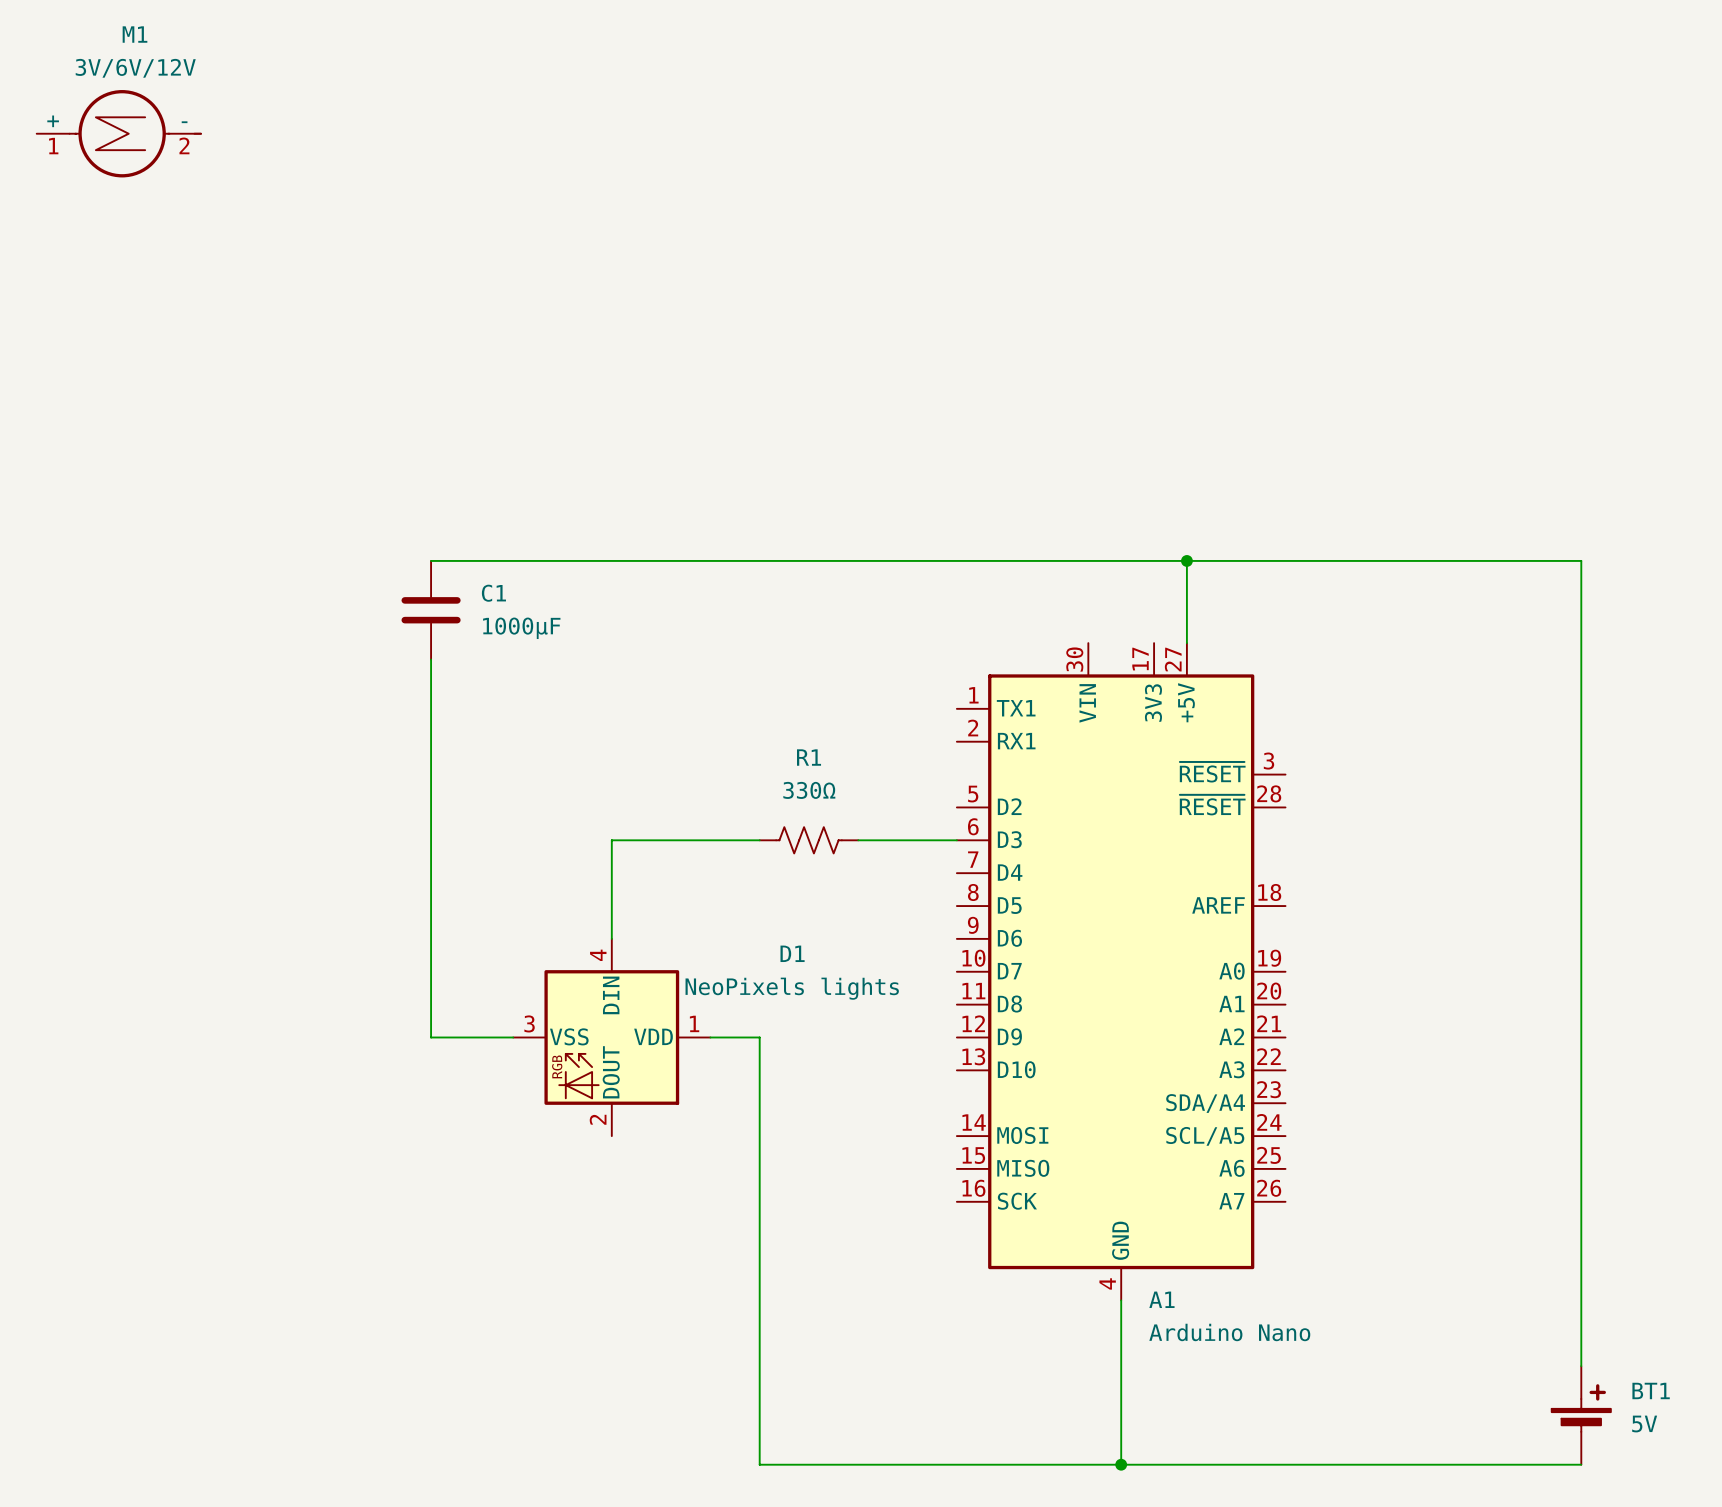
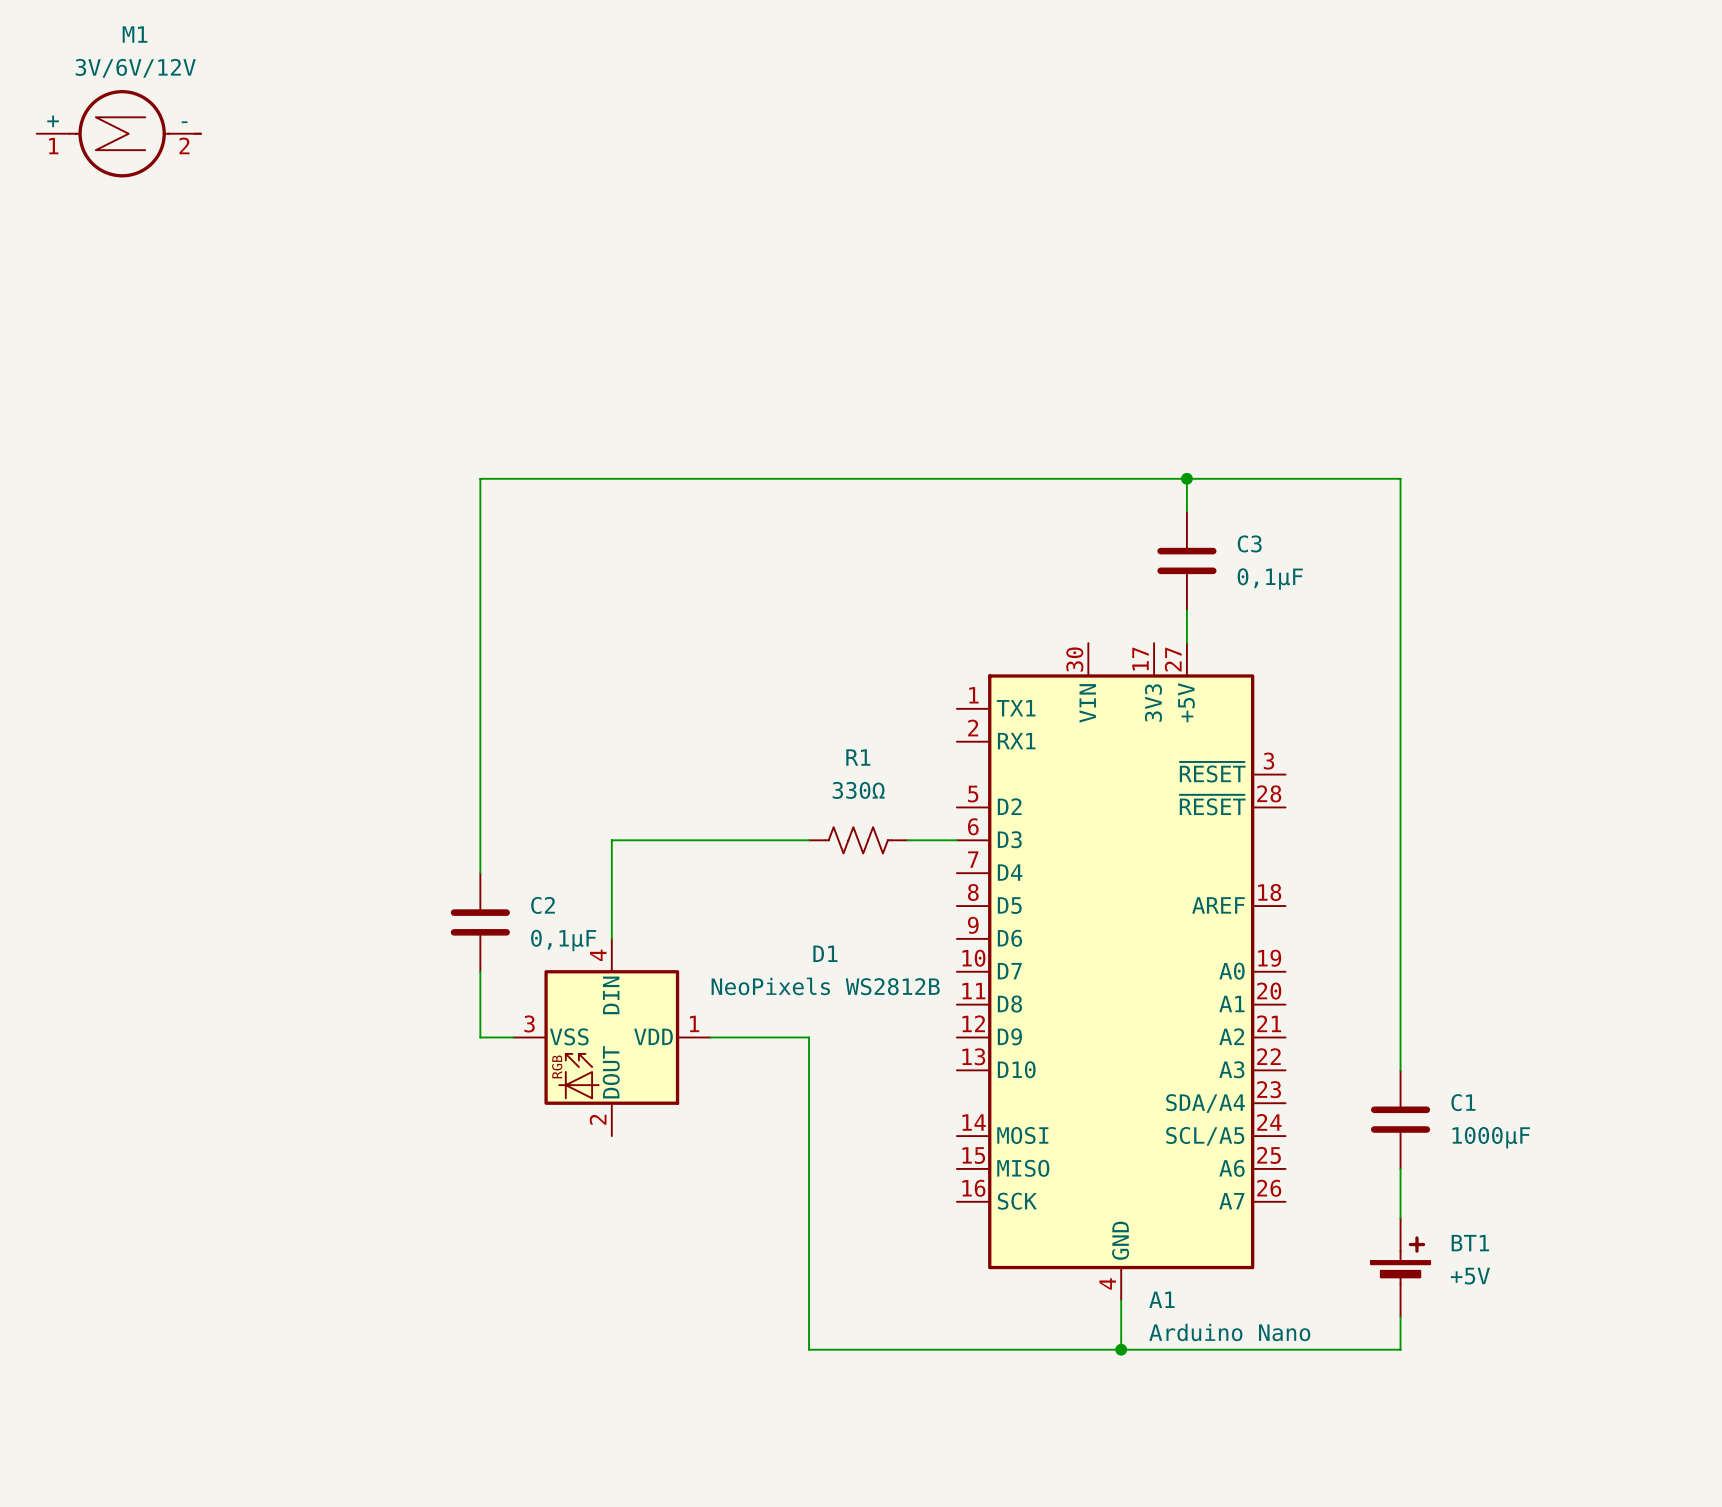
wire: none -> (1186, 478) (1186, 511)
junction: none -> (1186, 478)
wire: (431, 560) (1581, 560) (1581, 1366) -> none
junction: (1186, 560) -> none
C3: none -> 0,1µF (1186, 560)
C1 position: (431, 610) -> (1400, 1119)
wire: (431, 659) (431, 1037) (480, 1037) -> (480, 971) (480, 1037)
R1 position: (808, 840) -> (858, 840)
wire: none -> (480, 873) (480, 478) (1400, 478) (1400, 1070)
C2: none -> 0,1µF (480, 922)
D1 name position: D1 (792, 953) -> D1 (825, 953)
D1 value: NeoPixels lights (792, 988) -> NeoPixels WS2812B (825, 986)
wire: (759, 1037) (759, 1464) (1581, 1464) -> (759, 1037) (808, 1037) (808, 1349) (1400, 1349) (1400, 1316)
wire: none -> (1400, 1168) (1400, 1218)
wire: (1121, 1349) (1121, 1464) -> none
junction: none -> (1121, 1349)
BT1 position: (1581, 1415) -> (1400, 1267)
BT1 value: 5V (1644, 1424) -> +5V (1470, 1276)
junction: (1121, 1464) -> none

